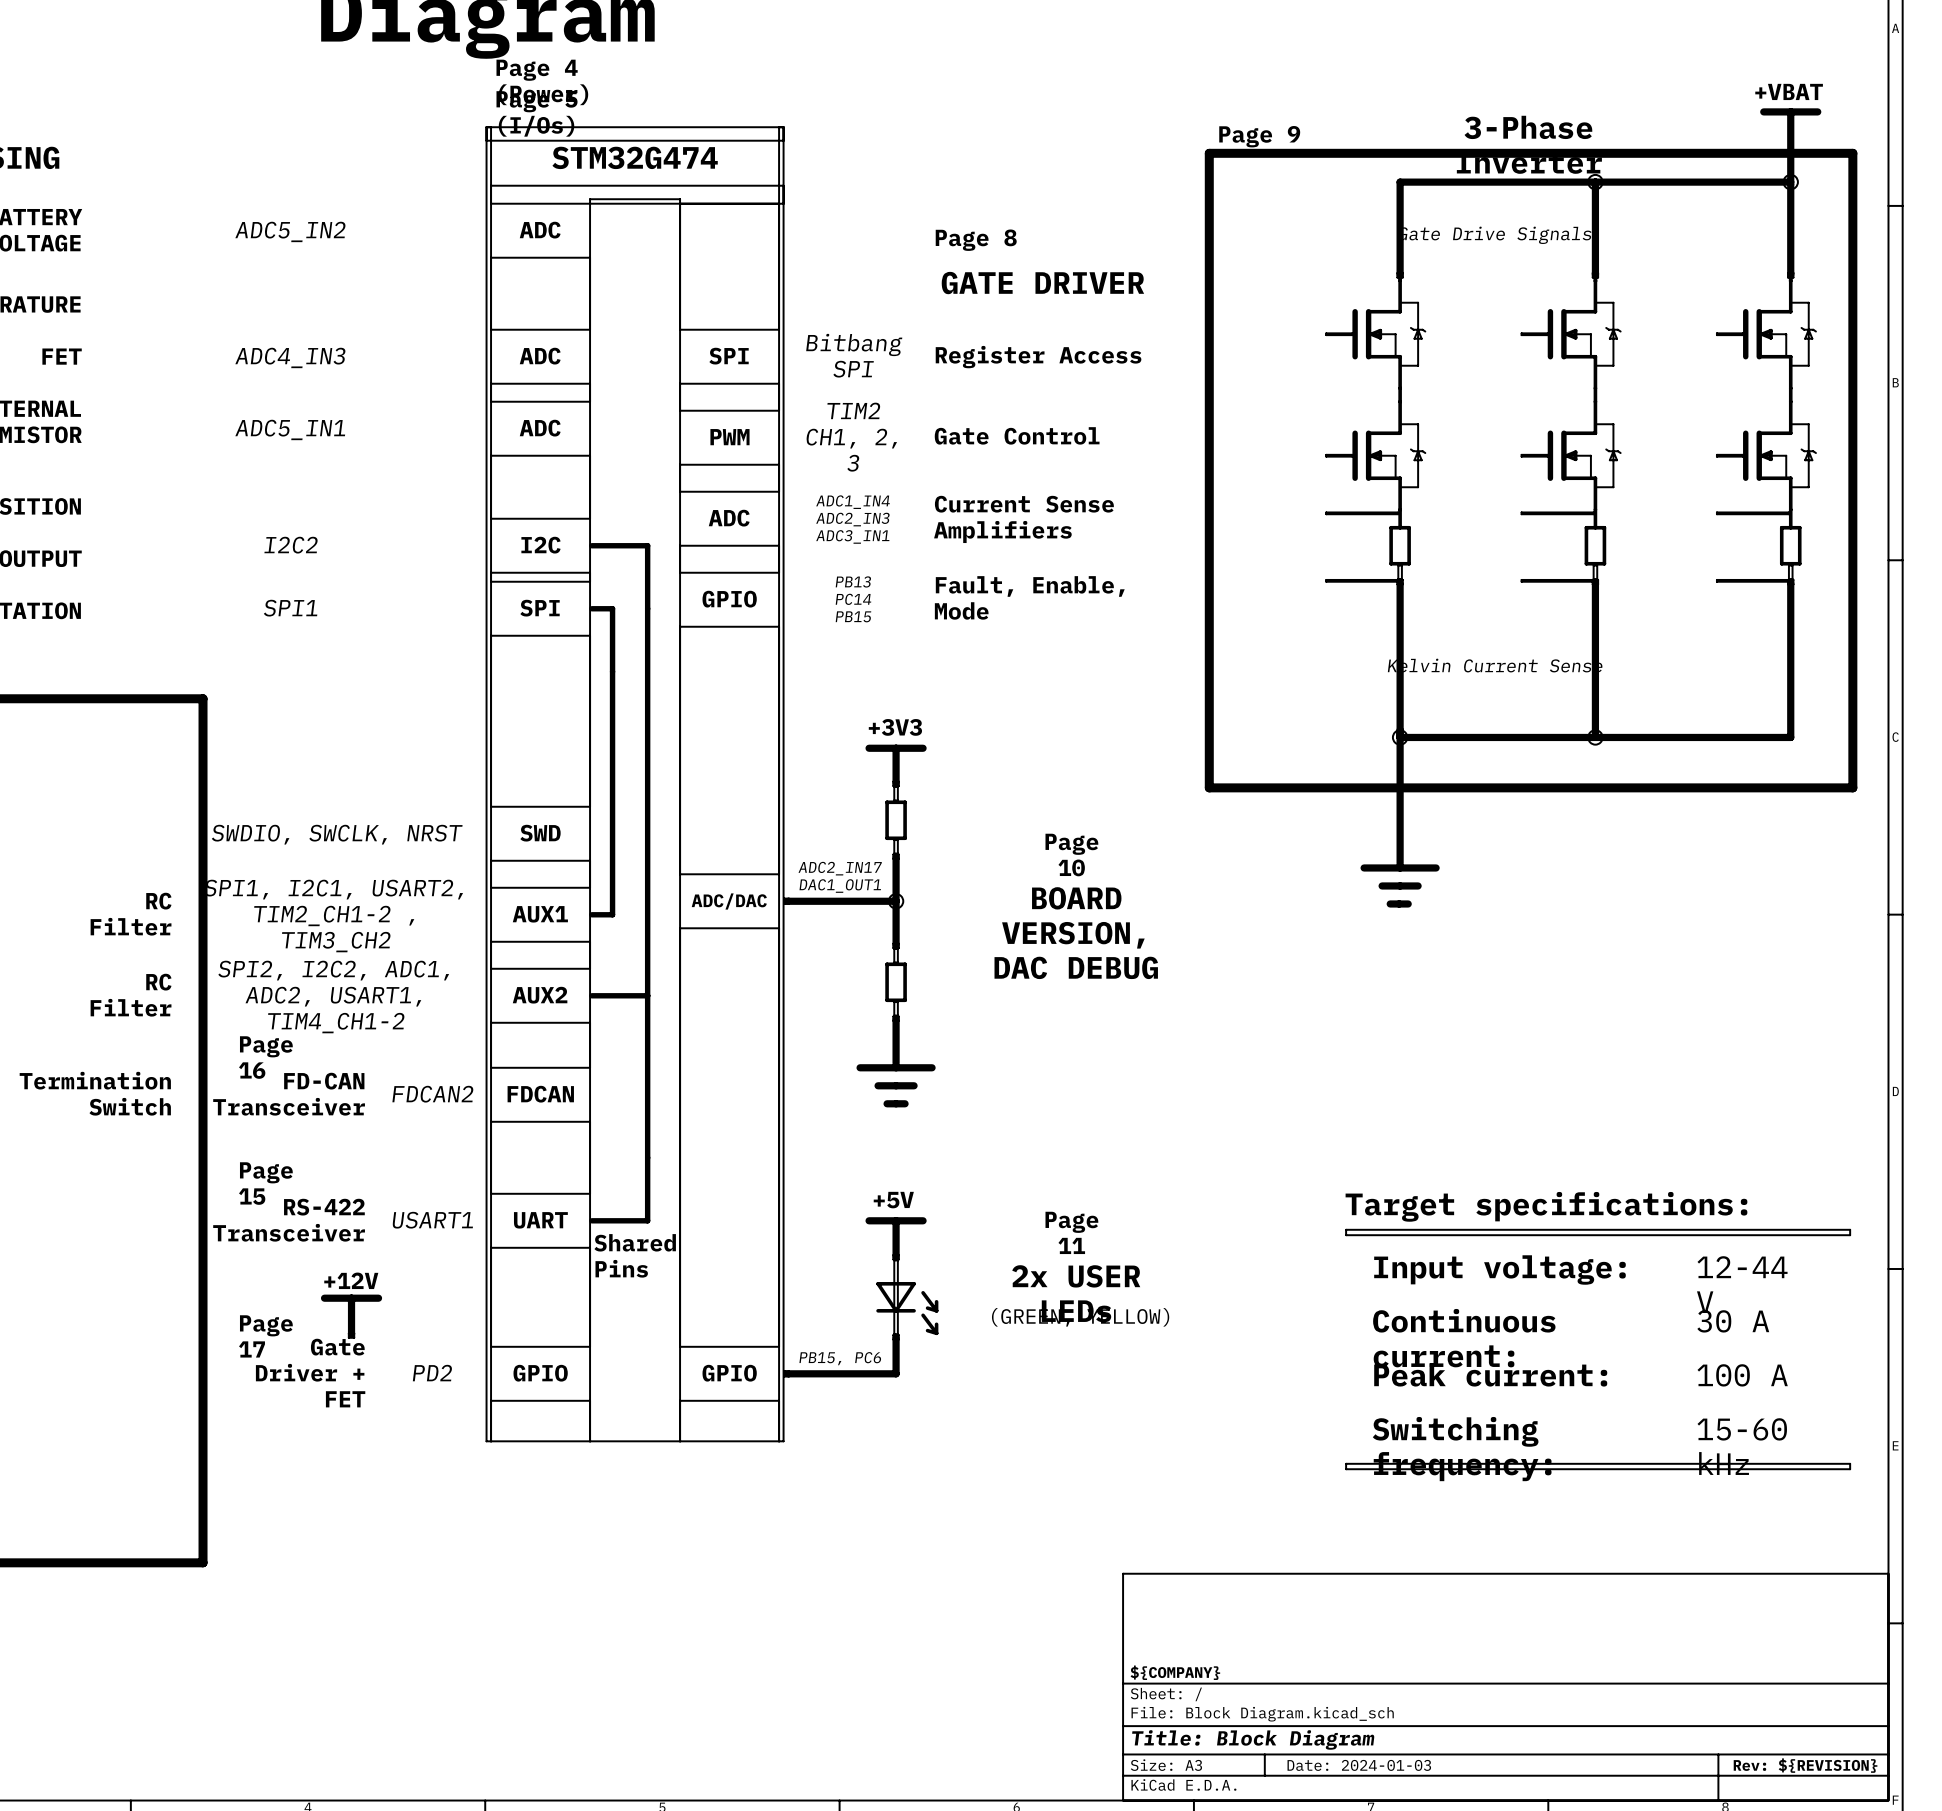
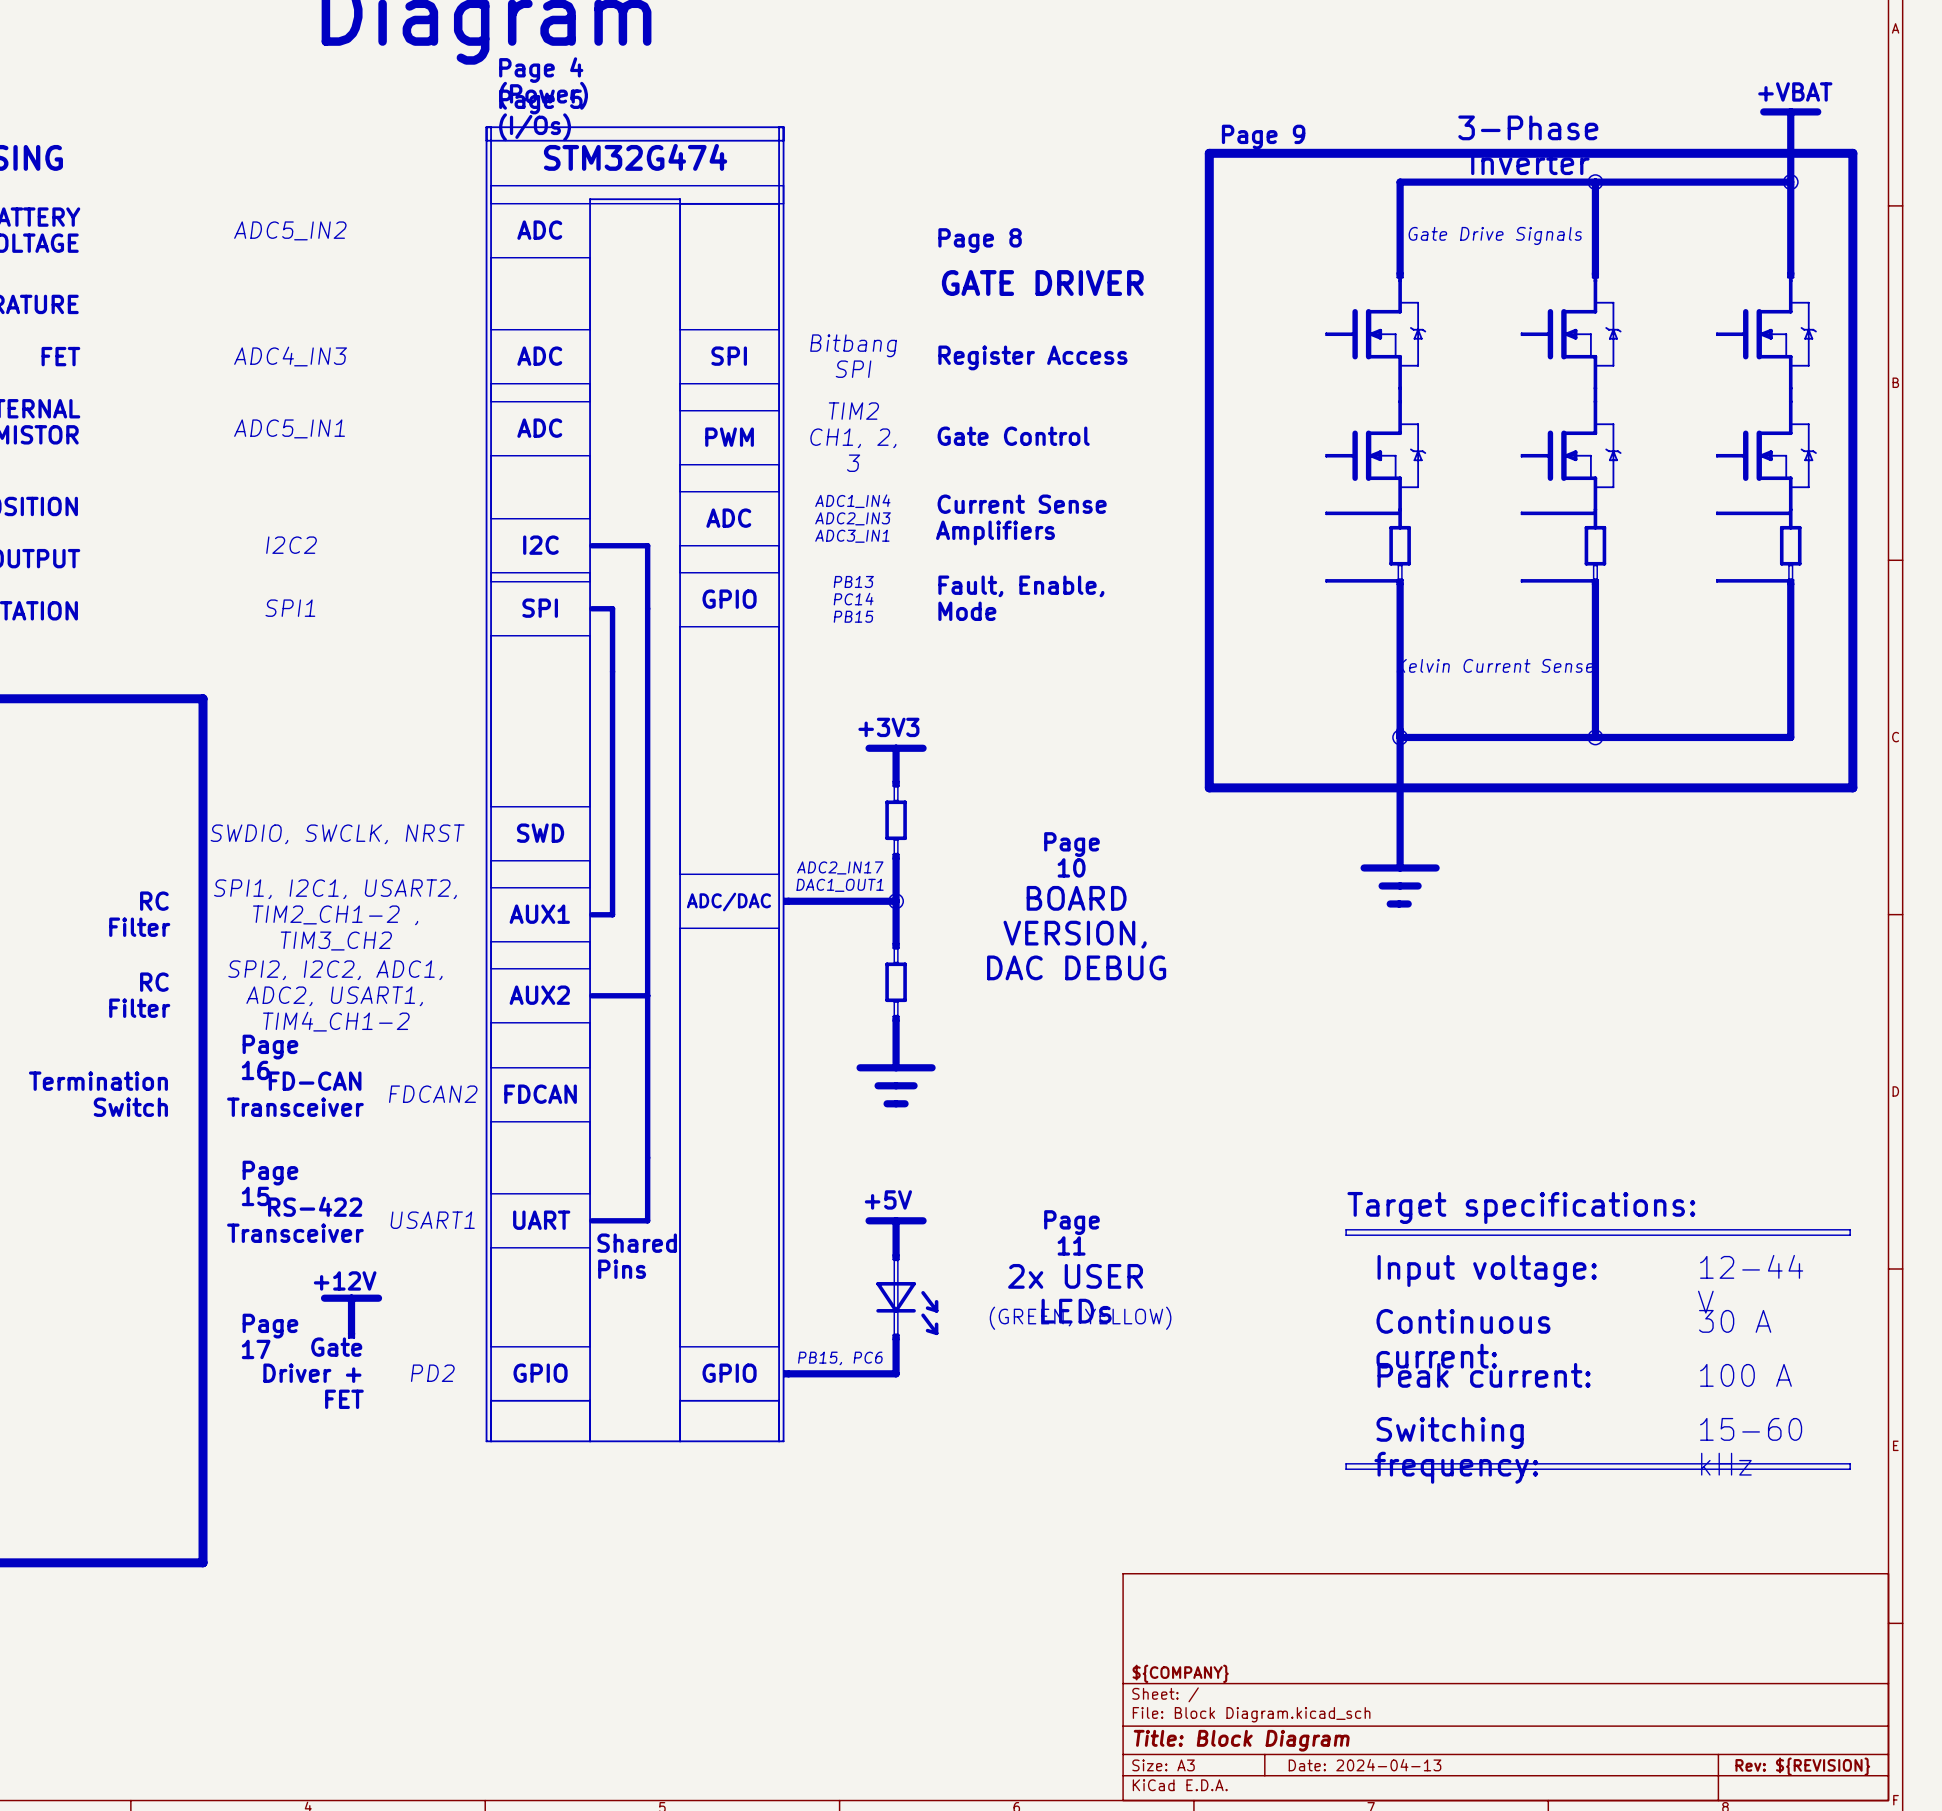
title block: Date: 2024-01-03 (1359, 1765) -> Date: 2024-04-13 (1365, 1765)

